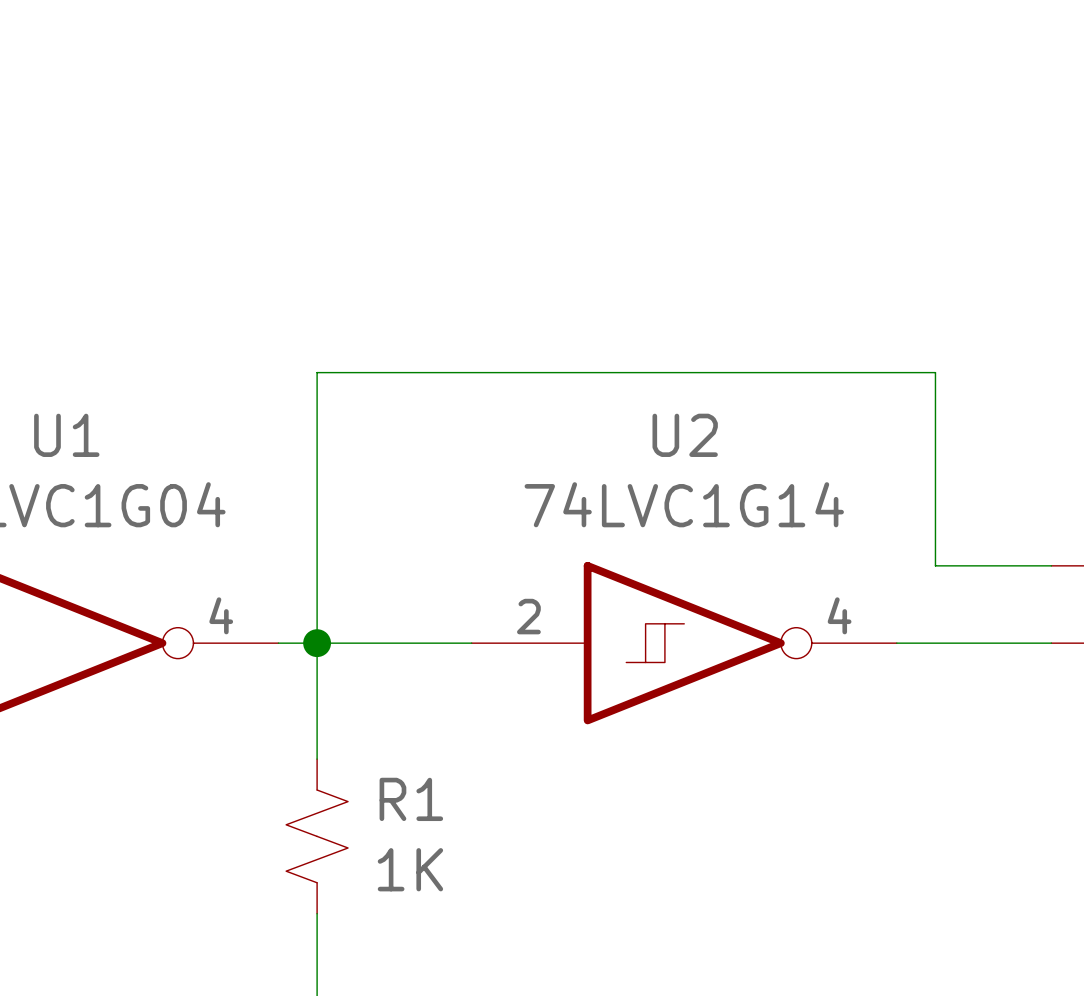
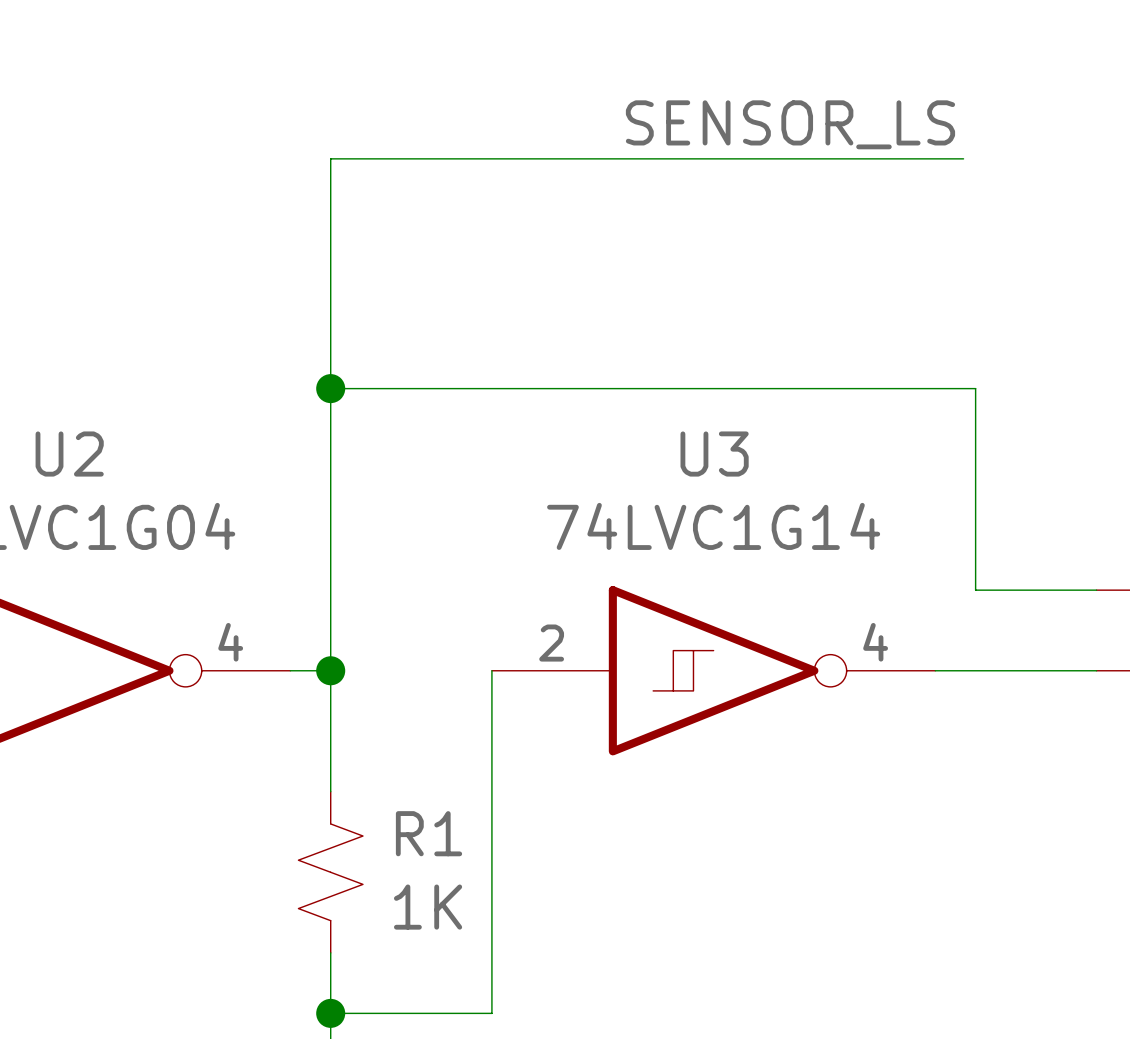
label: none -> SENSOR_LS (790, 124)
wire: none -> (963, 158) (330, 158) (330, 388)
junction: none -> (330, 388)
U1 name: U1 (66, 435) -> U2 (69, 454)
U2 name: U2 (685, 435) -> U3 (714, 454)
wire: (317, 643) (471, 643) -> (330, 1013) (491, 1013) (491, 670)
junction: none -> (330, 1013)

